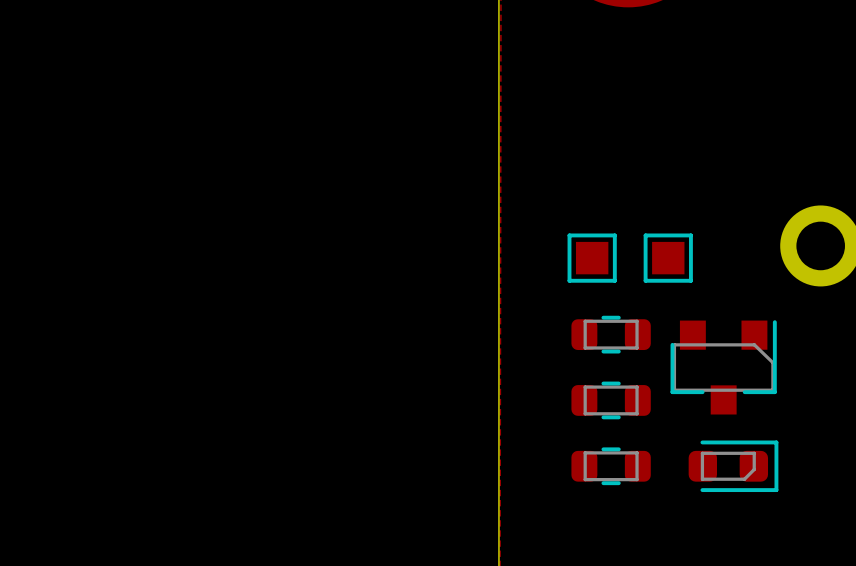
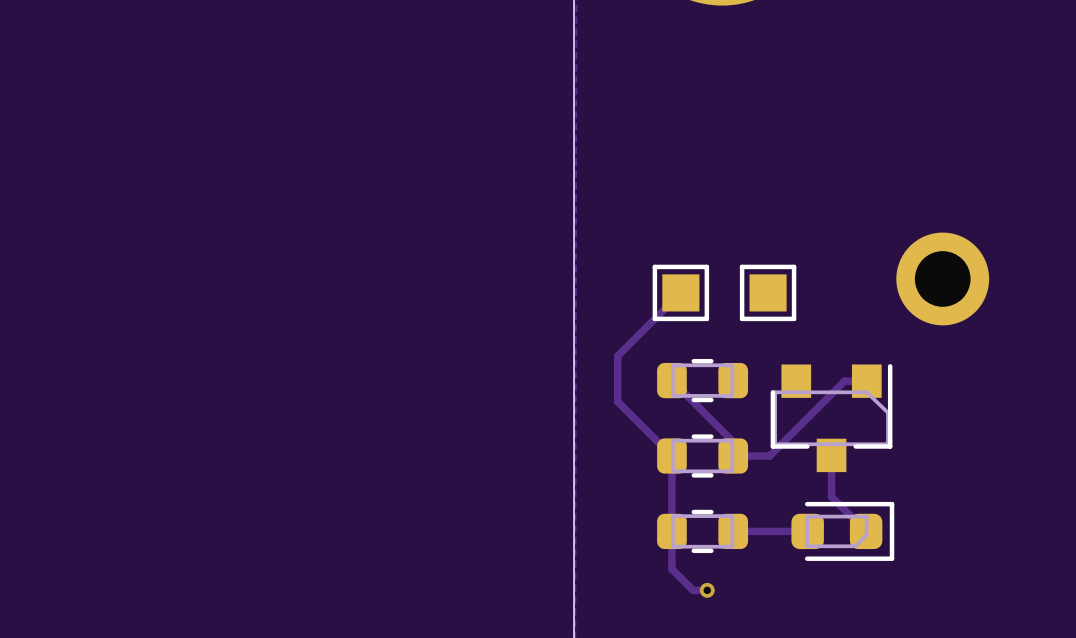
track: none -> (680, 292) (617, 356) (617, 401) (671, 456) (671, 569) (693, 590) (707, 590)
track: none -> (671, 380) (733, 441) (733, 456) (769, 456) (844, 381) (866, 381)
track: none -> (831, 455) (831, 496) (866, 531)
track: none -> (733, 531) (807, 531)
via: none -> (707, 590)

